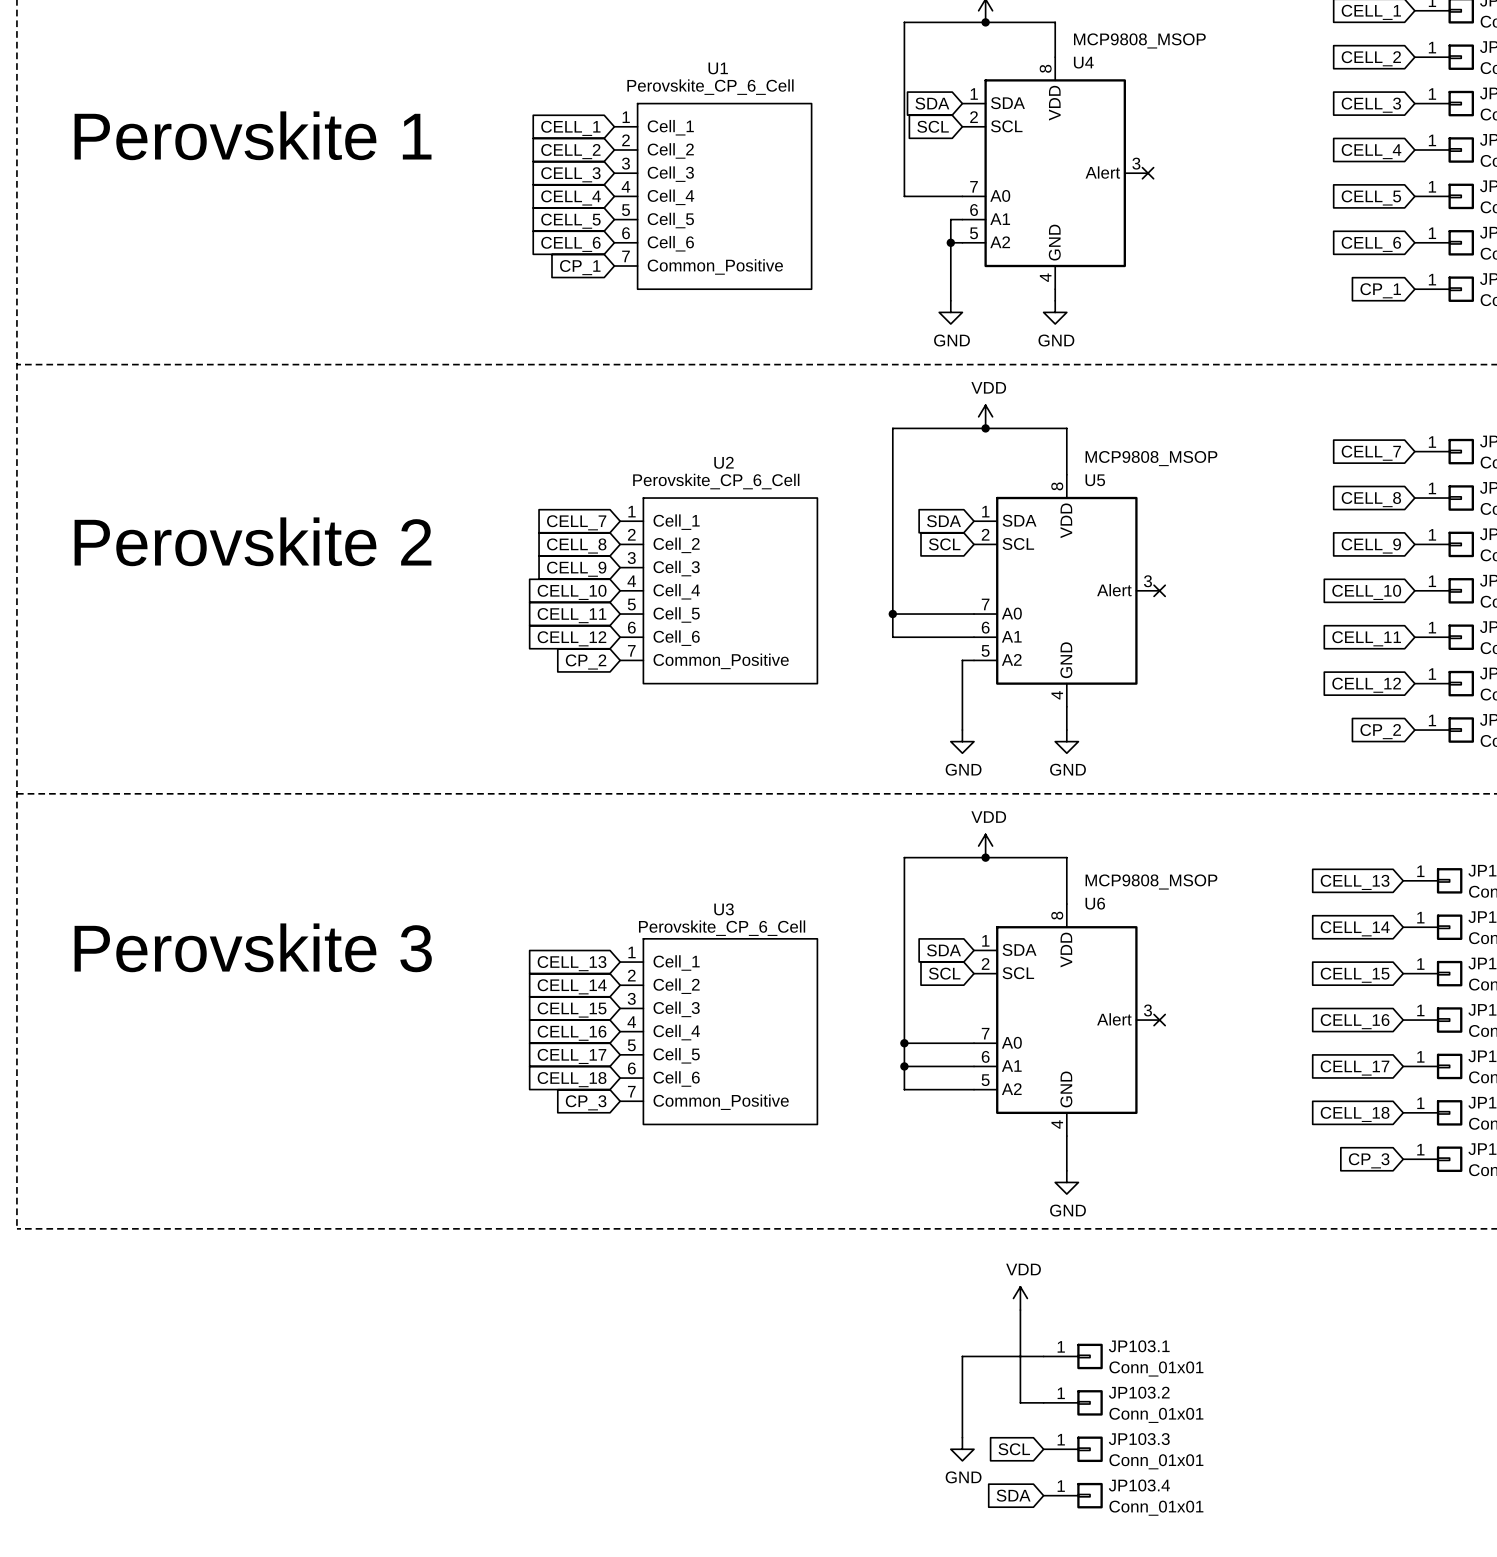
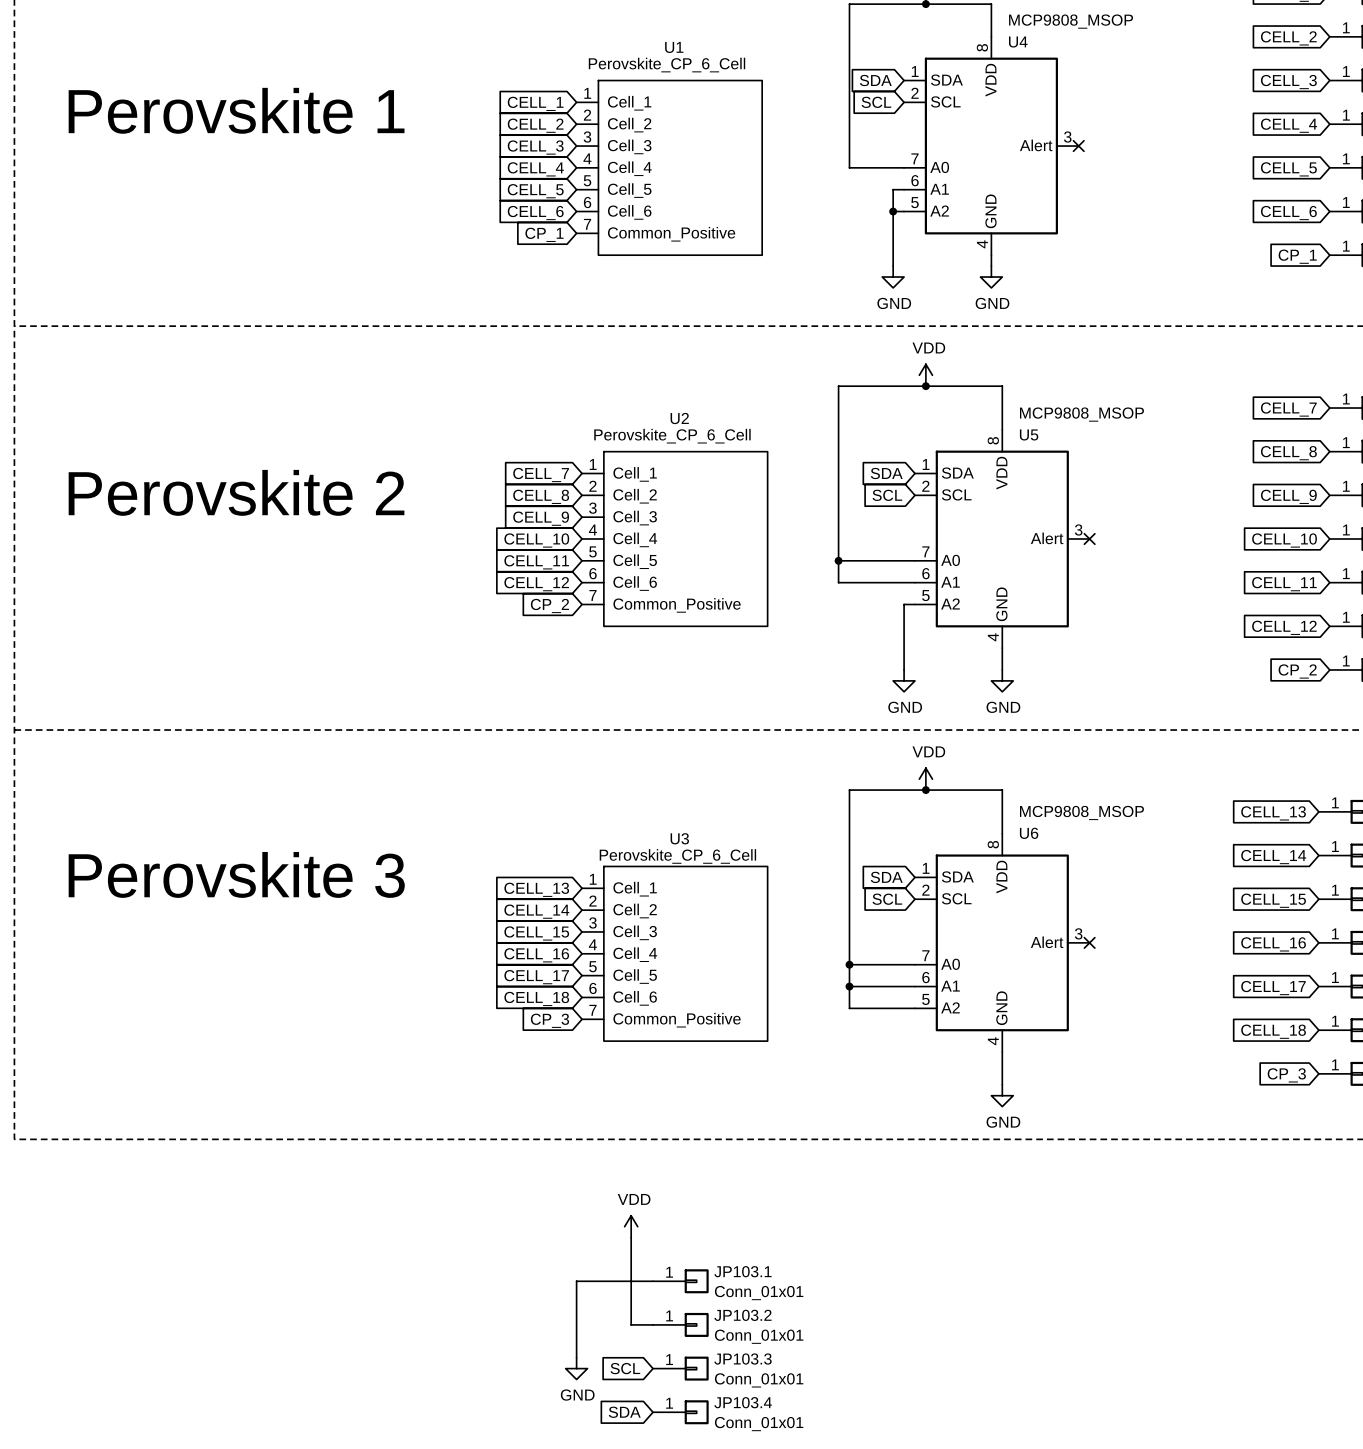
power symbol: VDD (1020, 1298) -> none
wire: (1020, 1310) (1020, 1402) (1043, 1402) -> none
power symbol: none -> VDD (631, 1226)
wire: none -> (631, 1237) (631, 1324) (653, 1324)
wire: (1043, 1356) (962, 1356) (962, 1437) -> none
JP103.1 position: (1073, 1356) -> (680, 1281)
wire: none -> (653, 1281) (576, 1281) (576, 1357)
JP103.2 position: (1073, 1402) -> (680, 1324)
power symbol: GND (962, 1449) -> none
global label: SCL (1014, 1449) -> none
JP103.3 position: (1073, 1449) -> (680, 1368)
power symbol: none -> GND (576, 1368)
global label: none -> SCL (625, 1368)
global label: SDA (1013, 1495) -> none
JP103.4 position: (1073, 1495) -> (680, 1412)
global label: none -> SDA (624, 1412)

